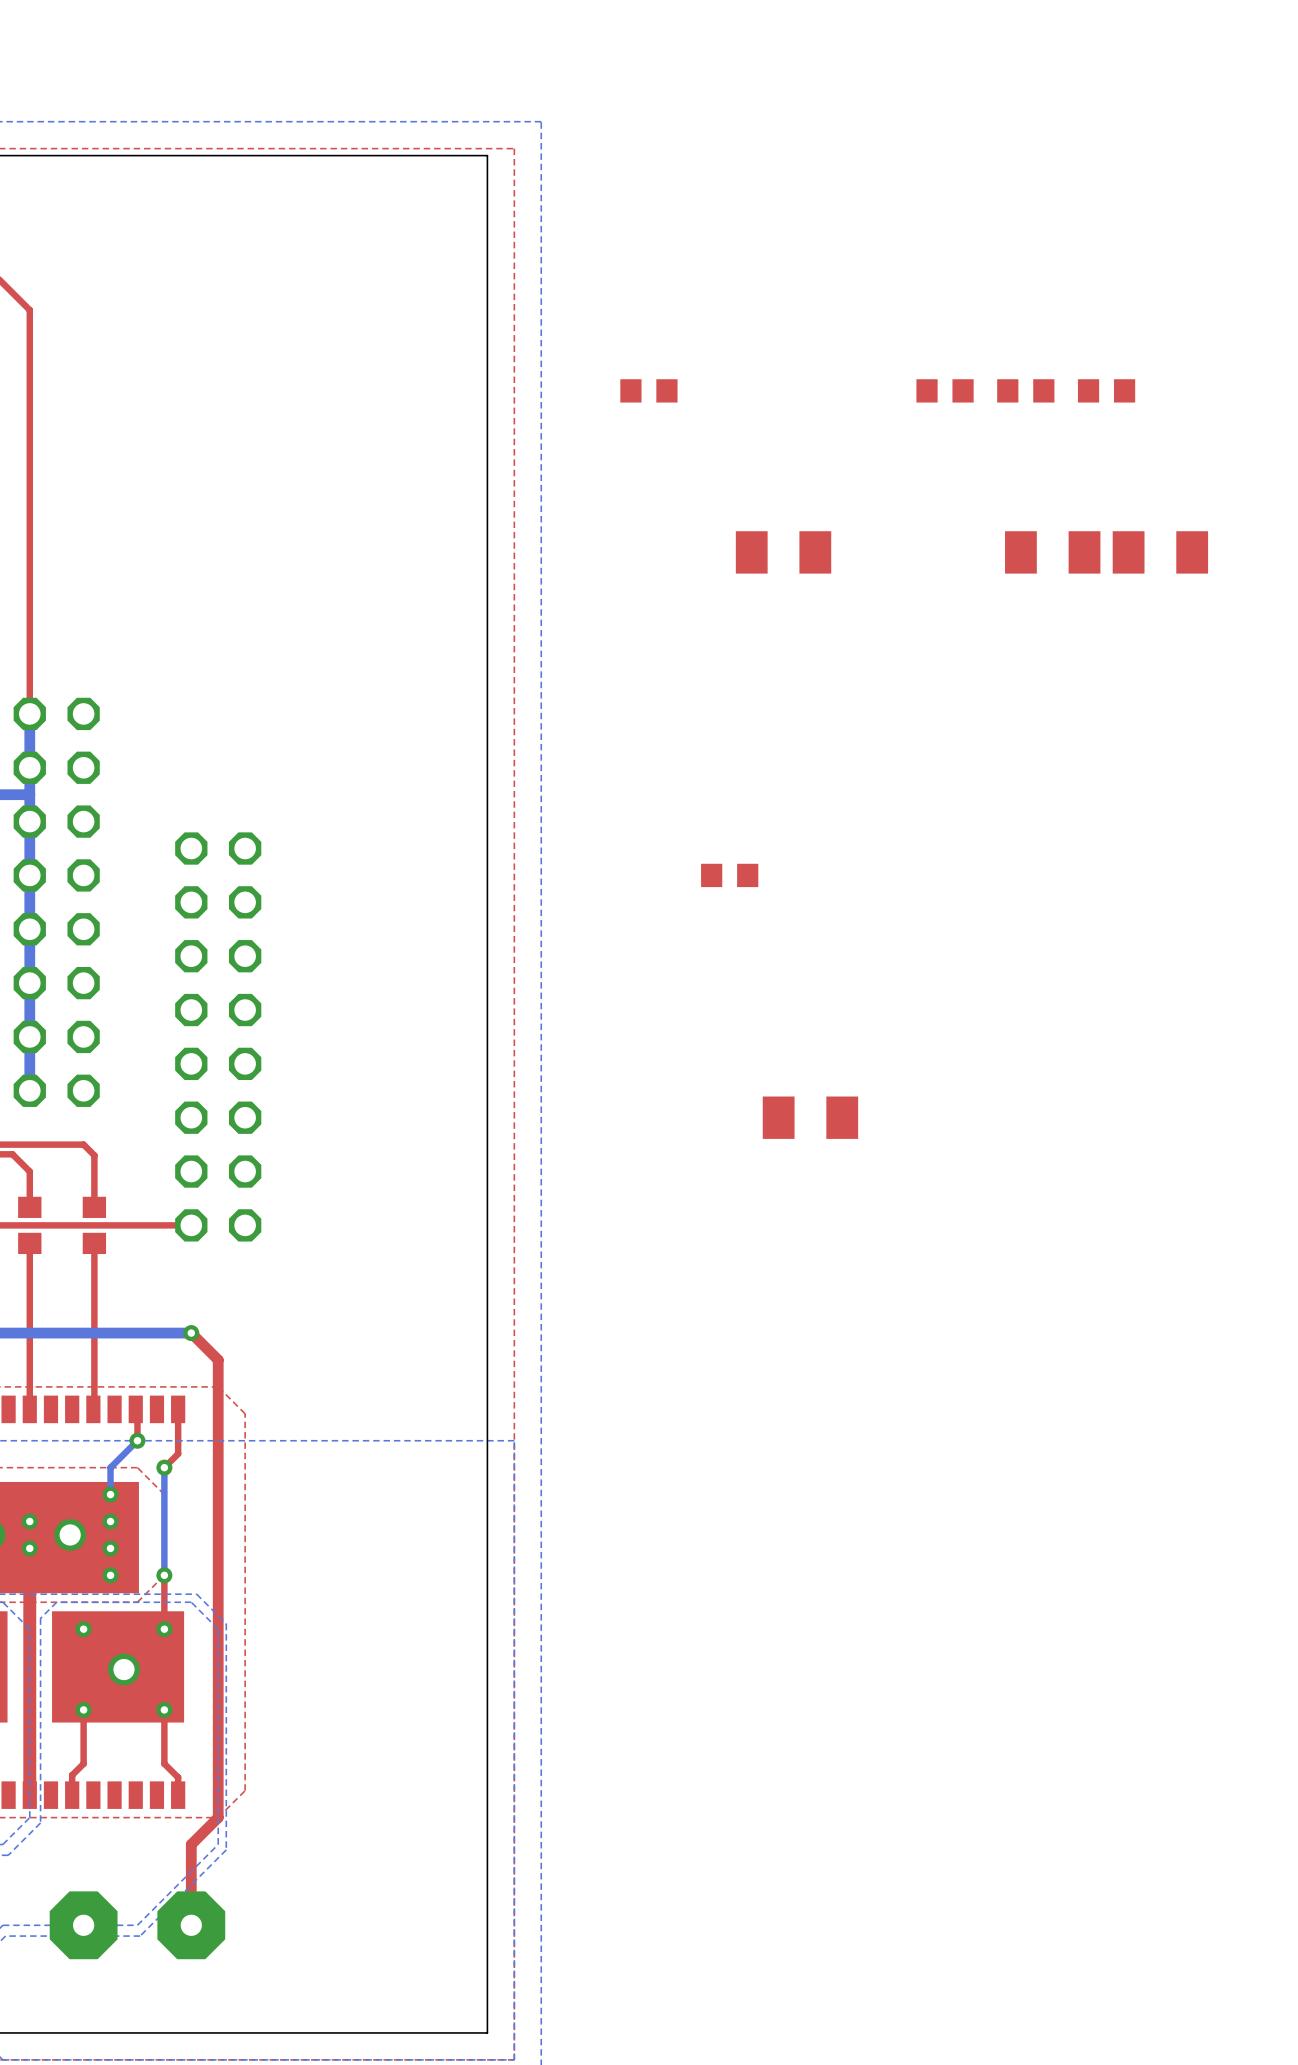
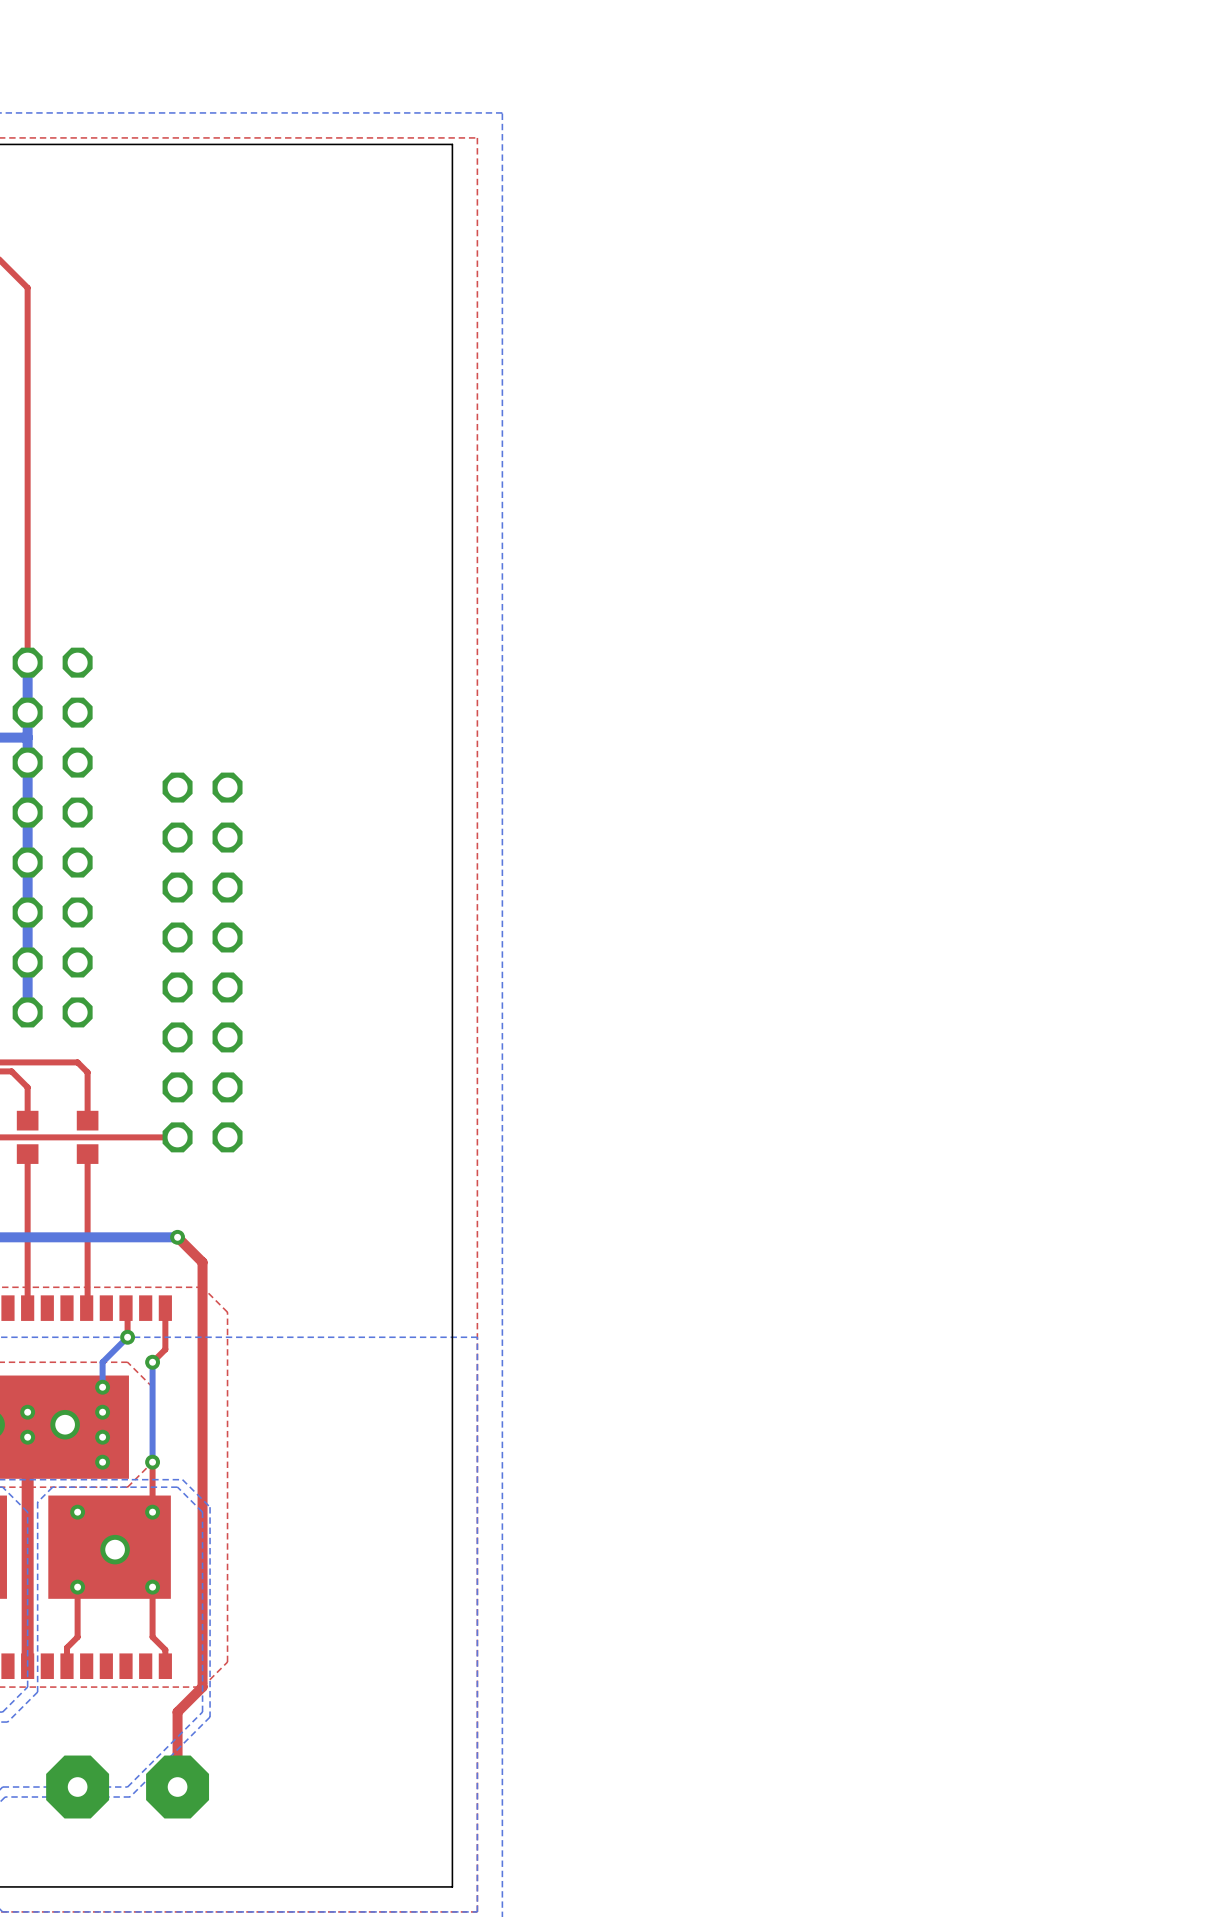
part: (648, 390) -> none
part: (945, 390) -> none
part: (1025, 390) -> none
part: (1106, 390) -> none
part: (783, 552) -> none
part: (1052, 552) -> none
part: (1160, 552) -> none
part: (729, 875) -> none
part: (810, 1117) -> none

